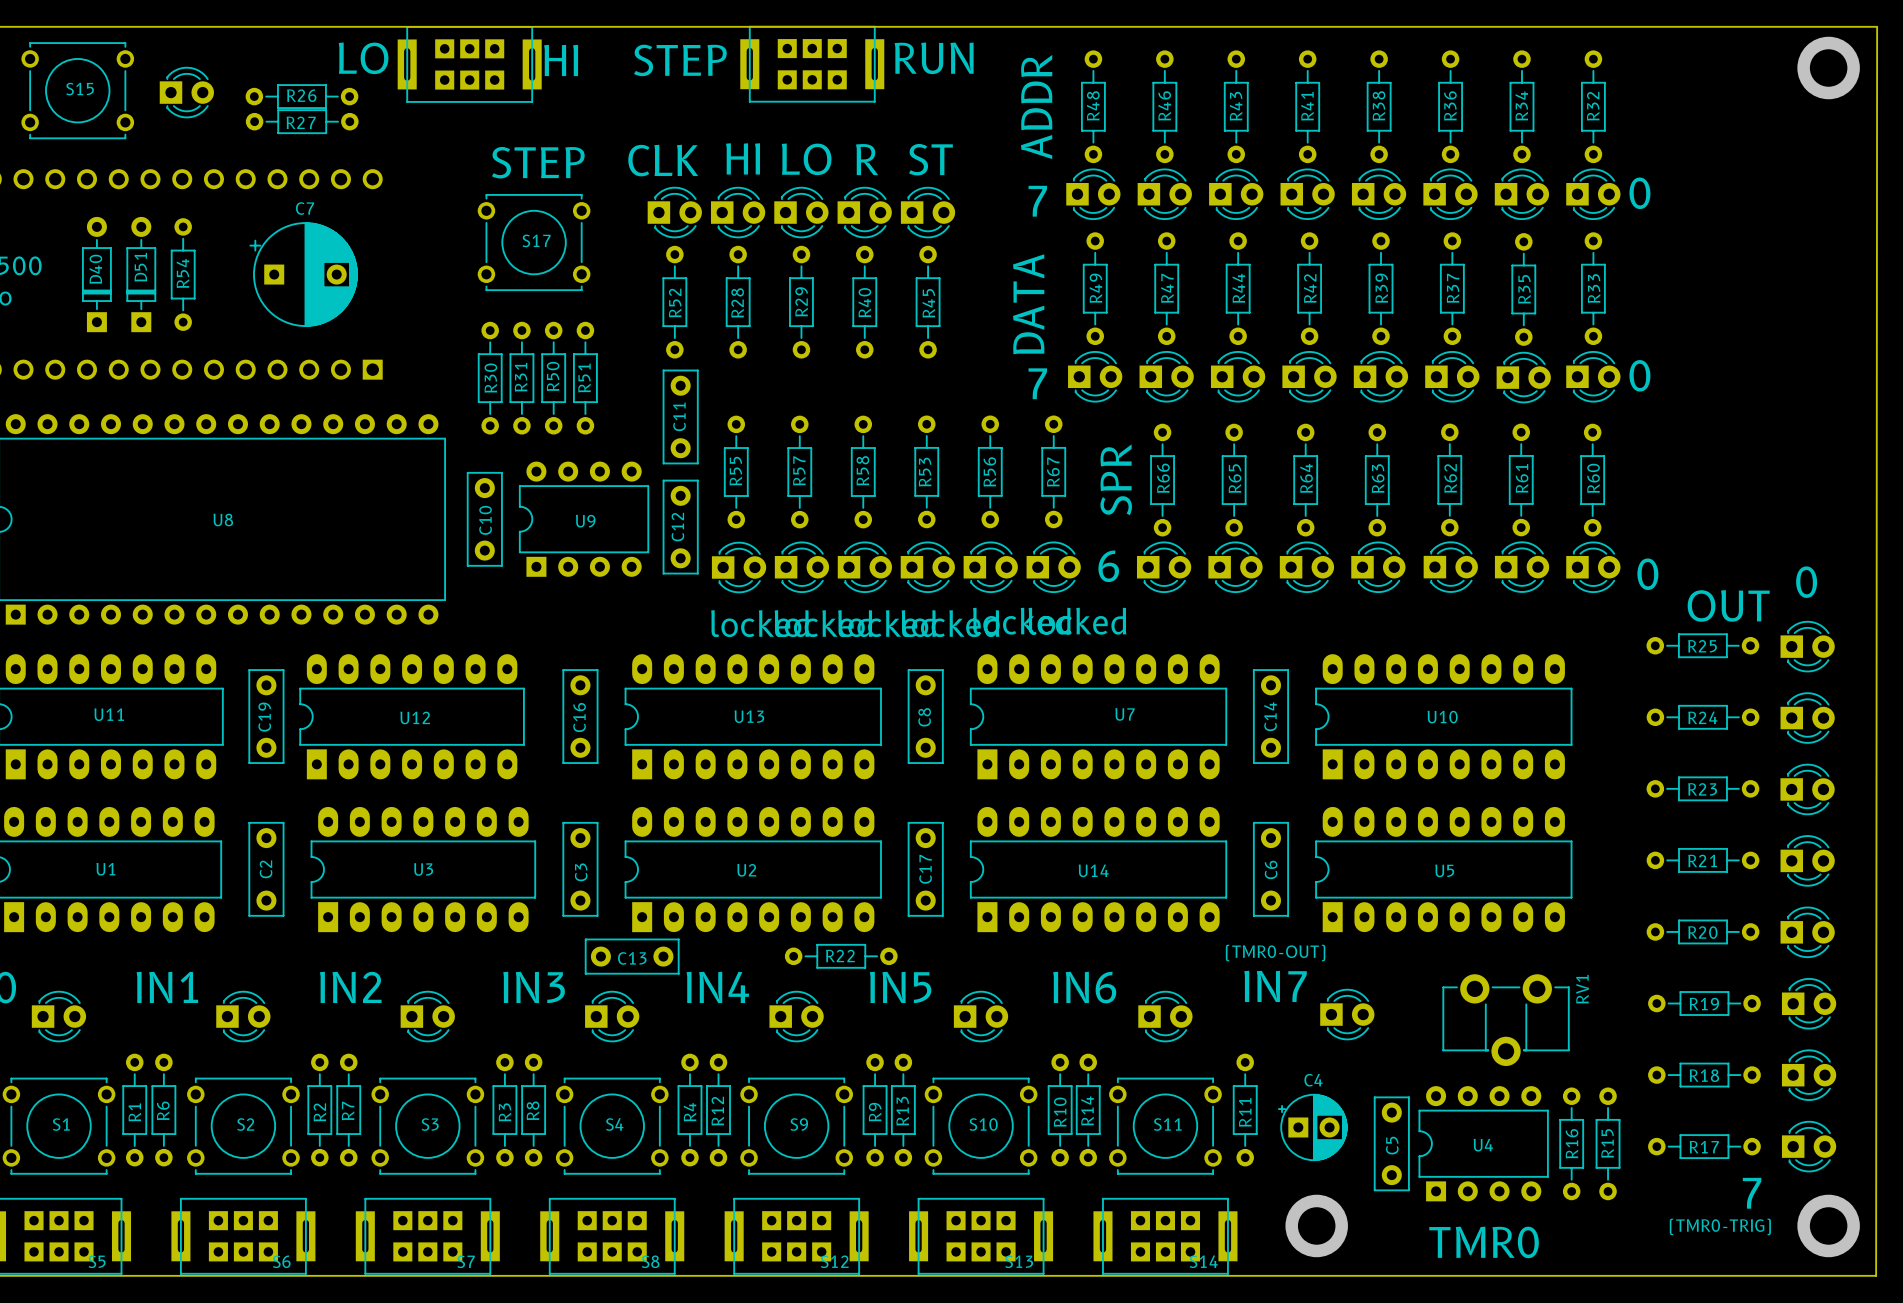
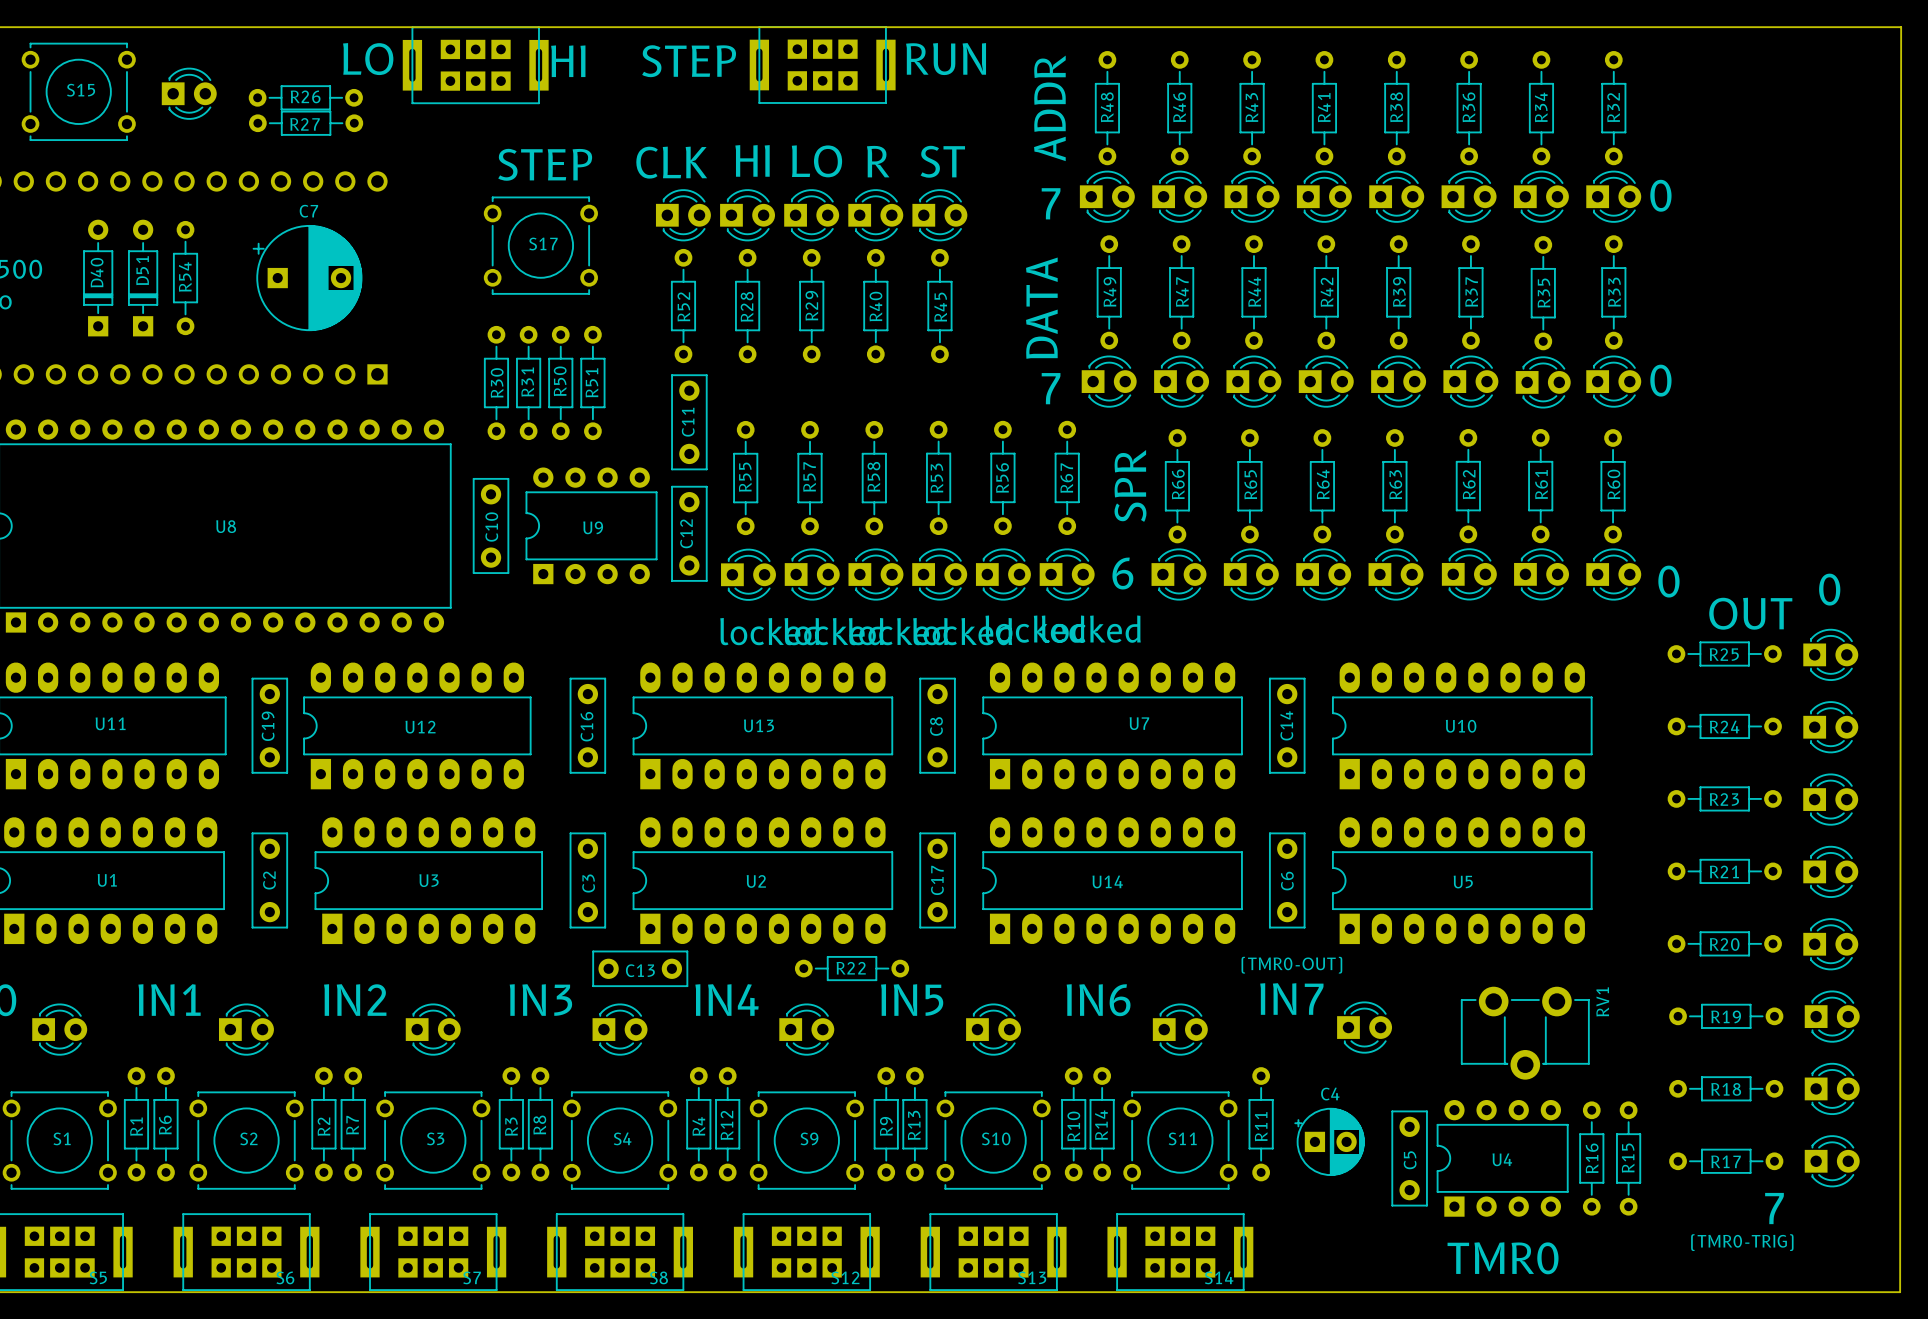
via: (1828, 68) -> none
via: (1316, 1225) -> none
via: (1828, 1225) -> none

